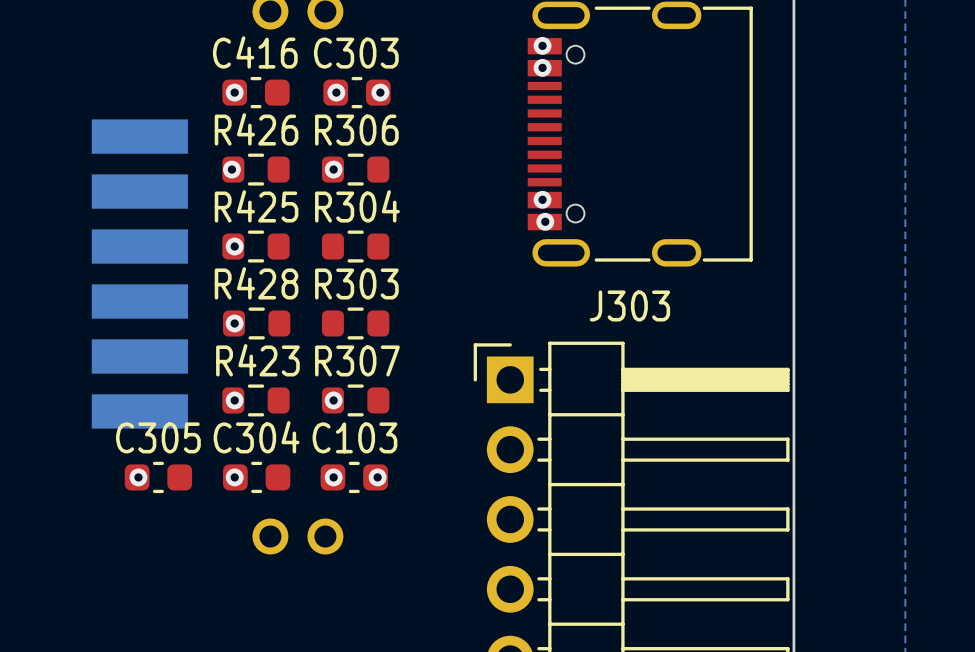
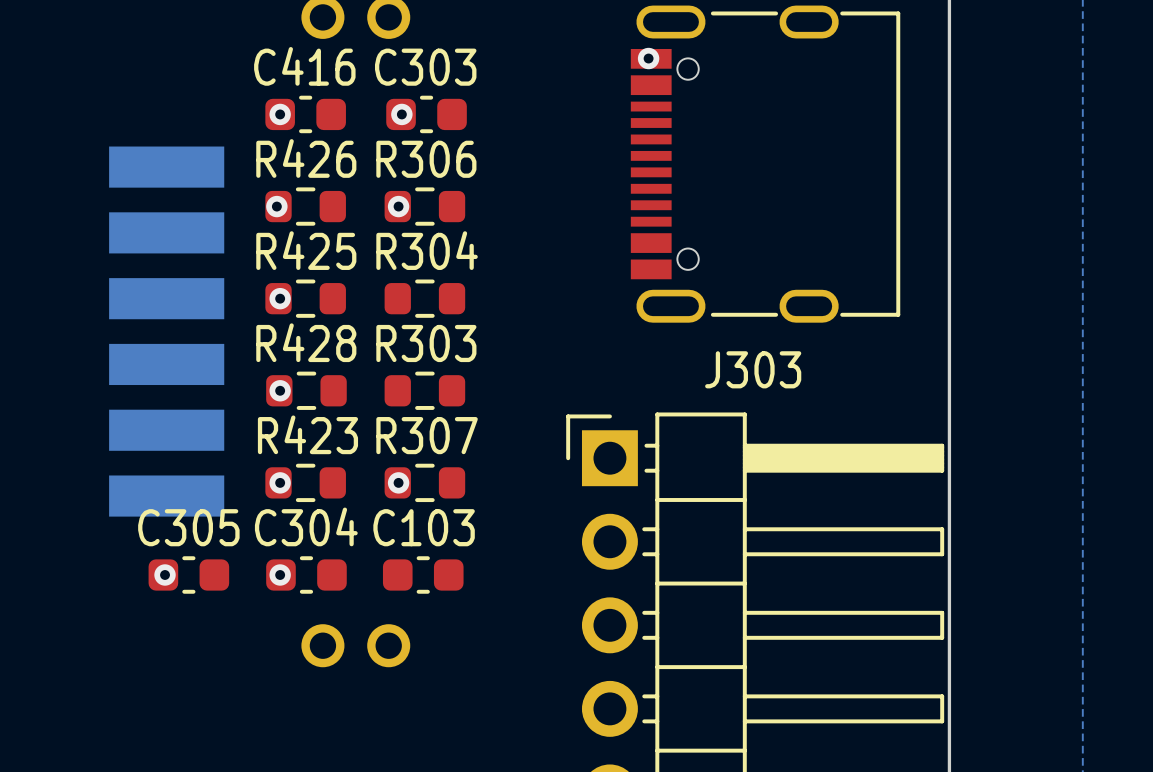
via: (542, 67) -> none
via: (380, 92) -> none
via: (542, 199) -> none
via: (545, 221) -> none
via: (333, 477) -> none
via: (377, 477) -> none

